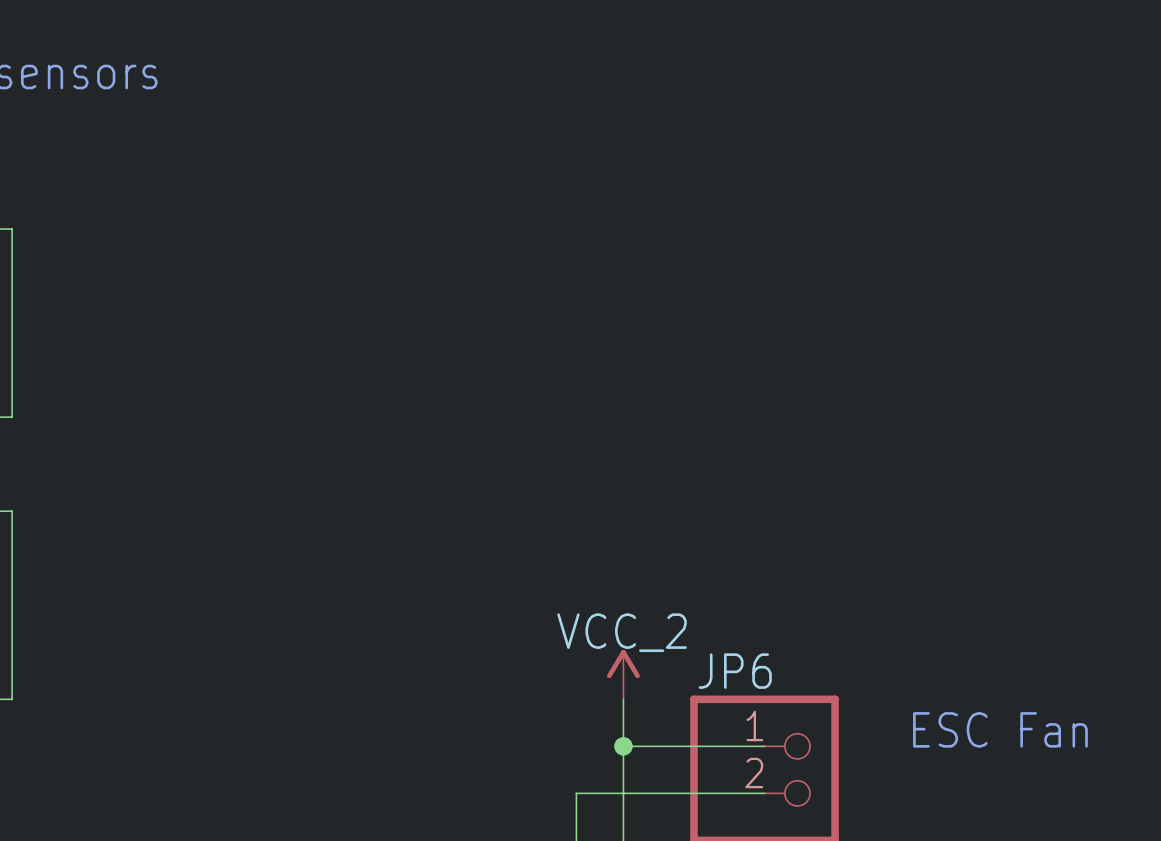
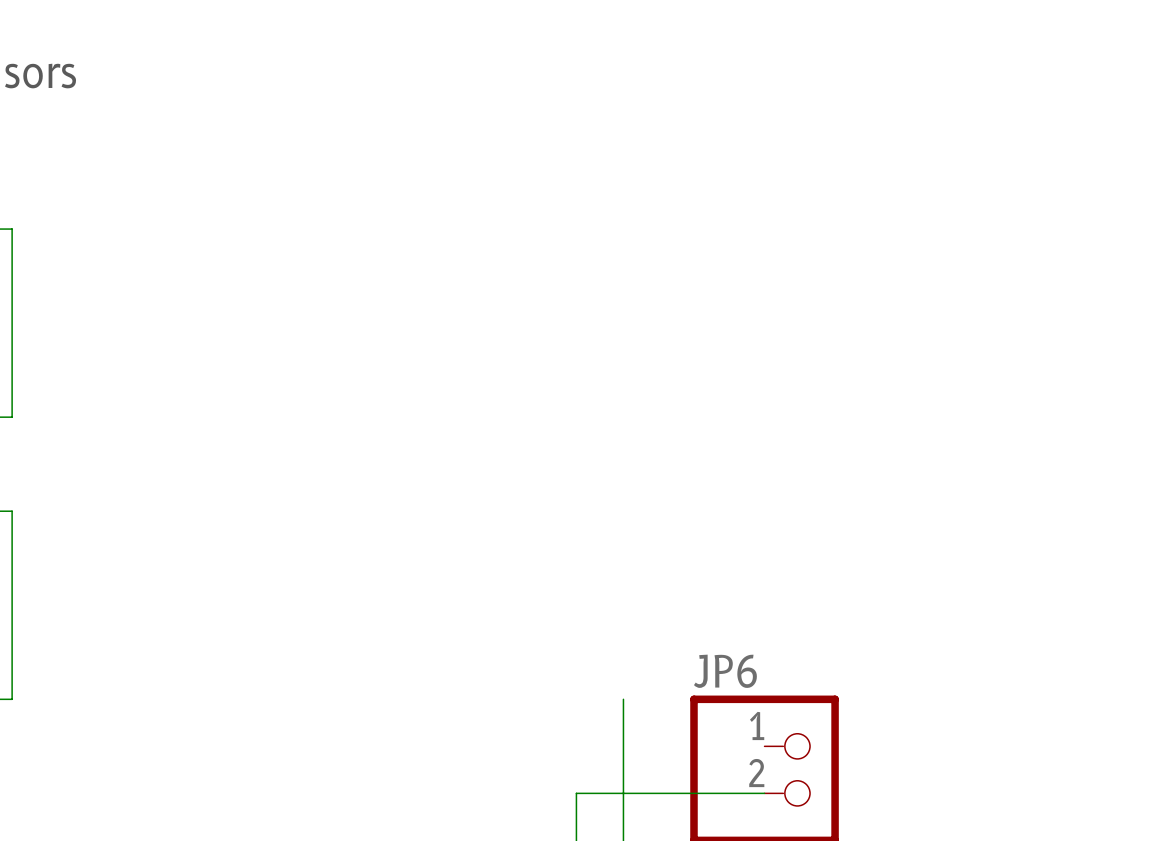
power symbol: VCC_2 (623, 674) -> none
text: ESC Fan (1000, 729) -> none
wire: (623, 746) (764, 746) -> none
junction: (623, 746) -> none

